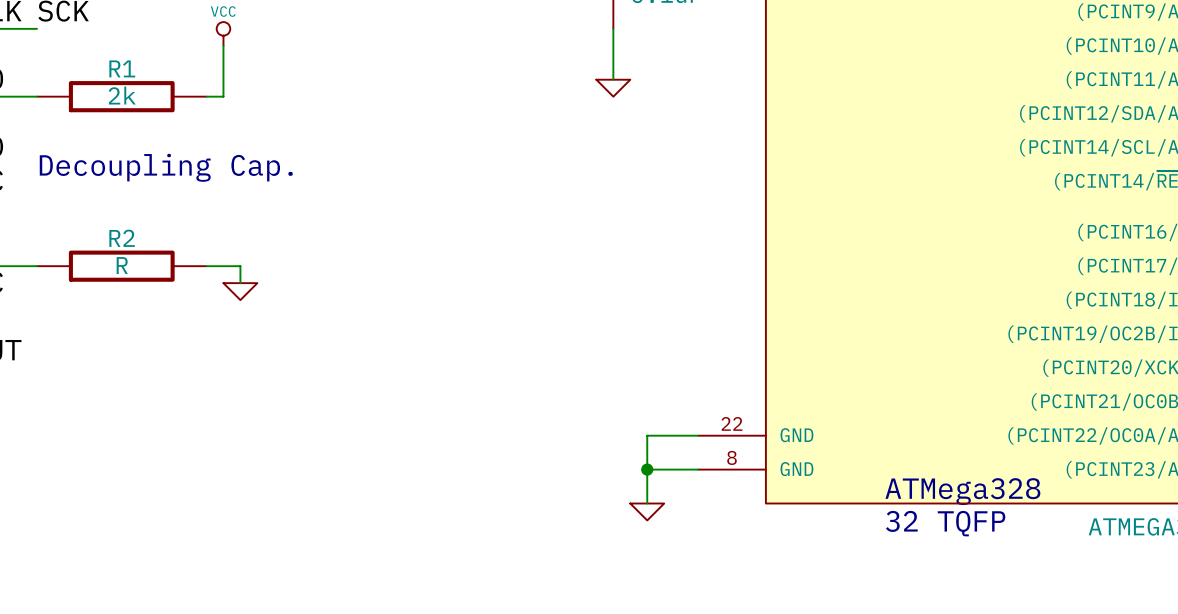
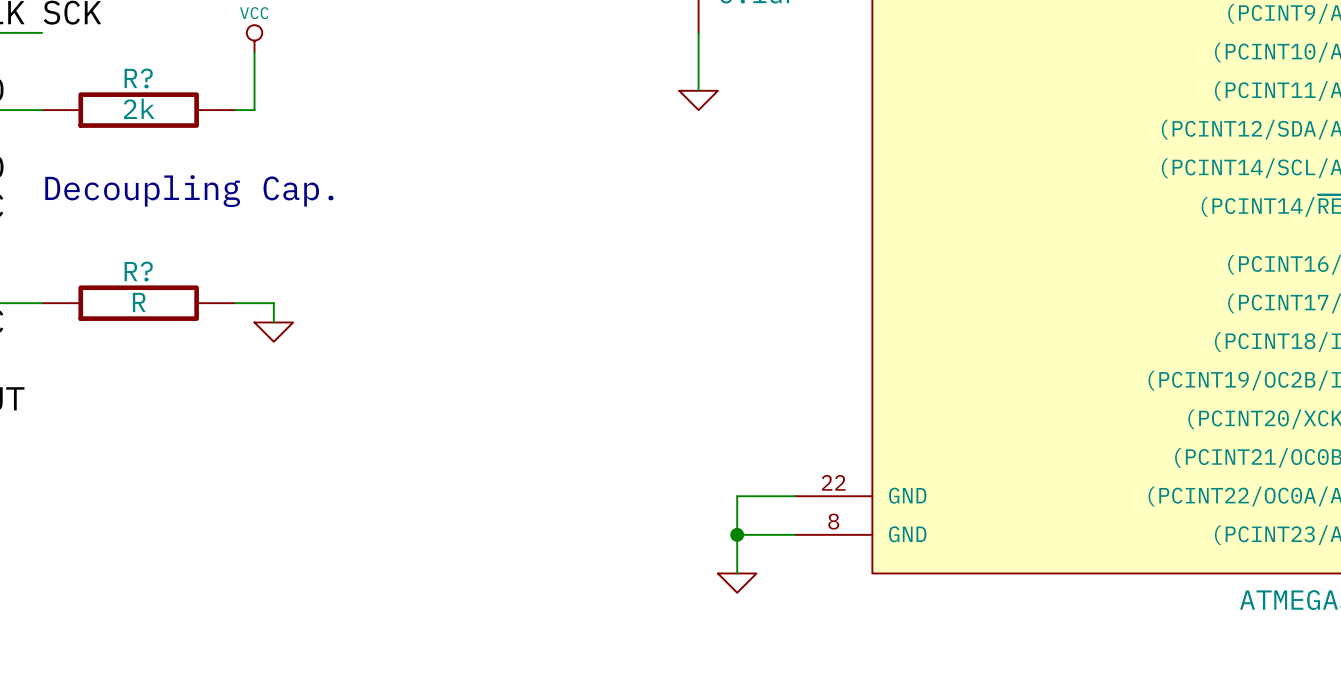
R1 name: R1 (122, 68) -> R? (138, 78)
R2 name: R2 (122, 238) -> R? (138, 271)
text: ATMega328 (962, 491) -> none
text: 32 TQFP (945, 523) -> none

